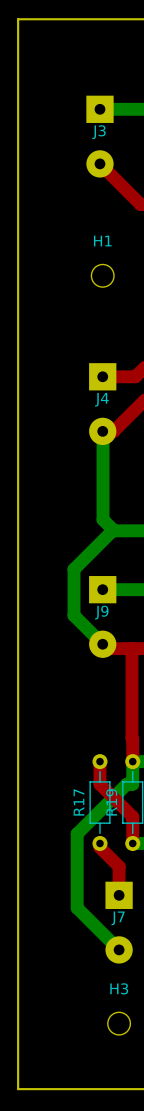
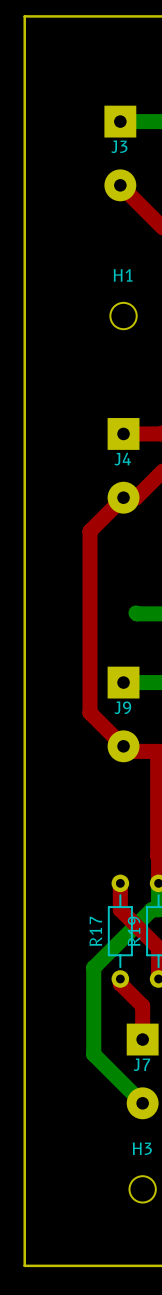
top track: none -> (123, 497) (90, 531) (90, 712) (123, 746)
bottom track: (102, 431) (103, 519) (113, 530) (74, 569) (74, 615) (102, 644) -> none

